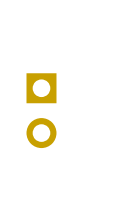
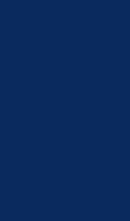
part: (41, 110) -> none

